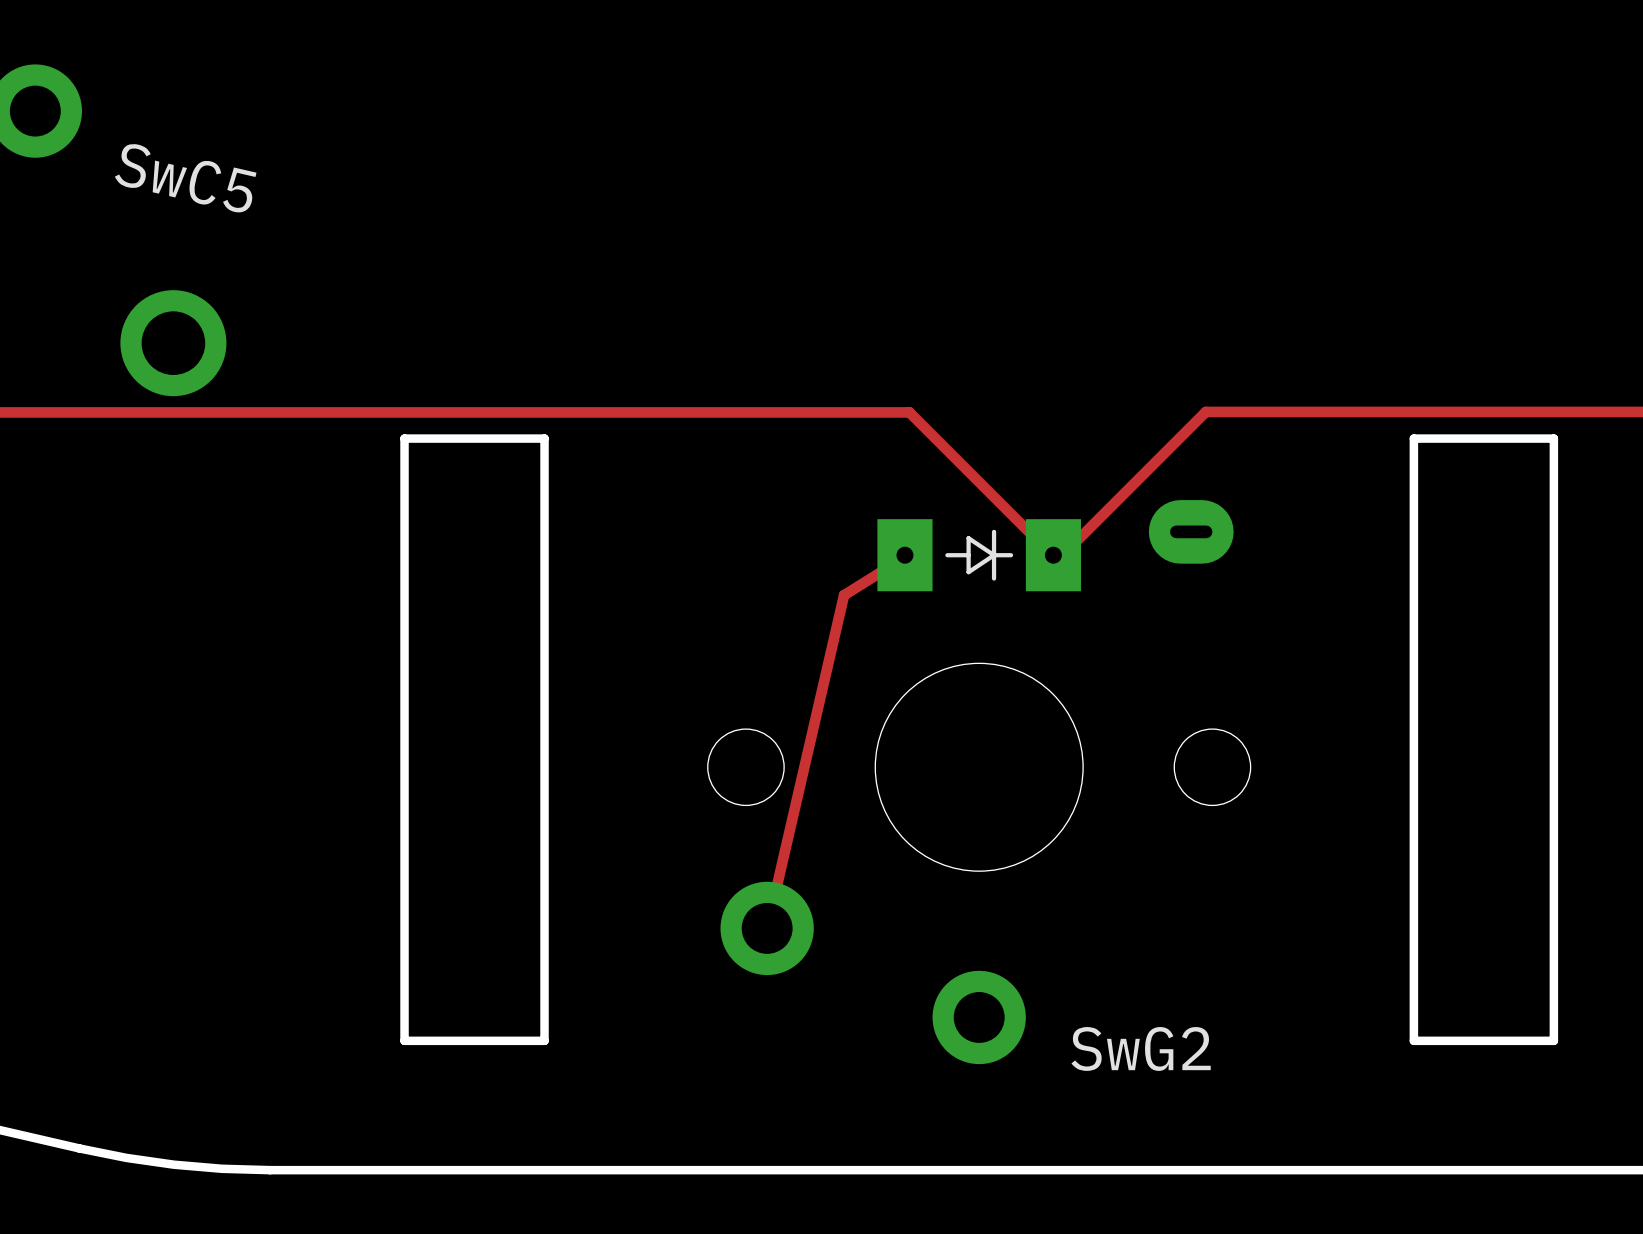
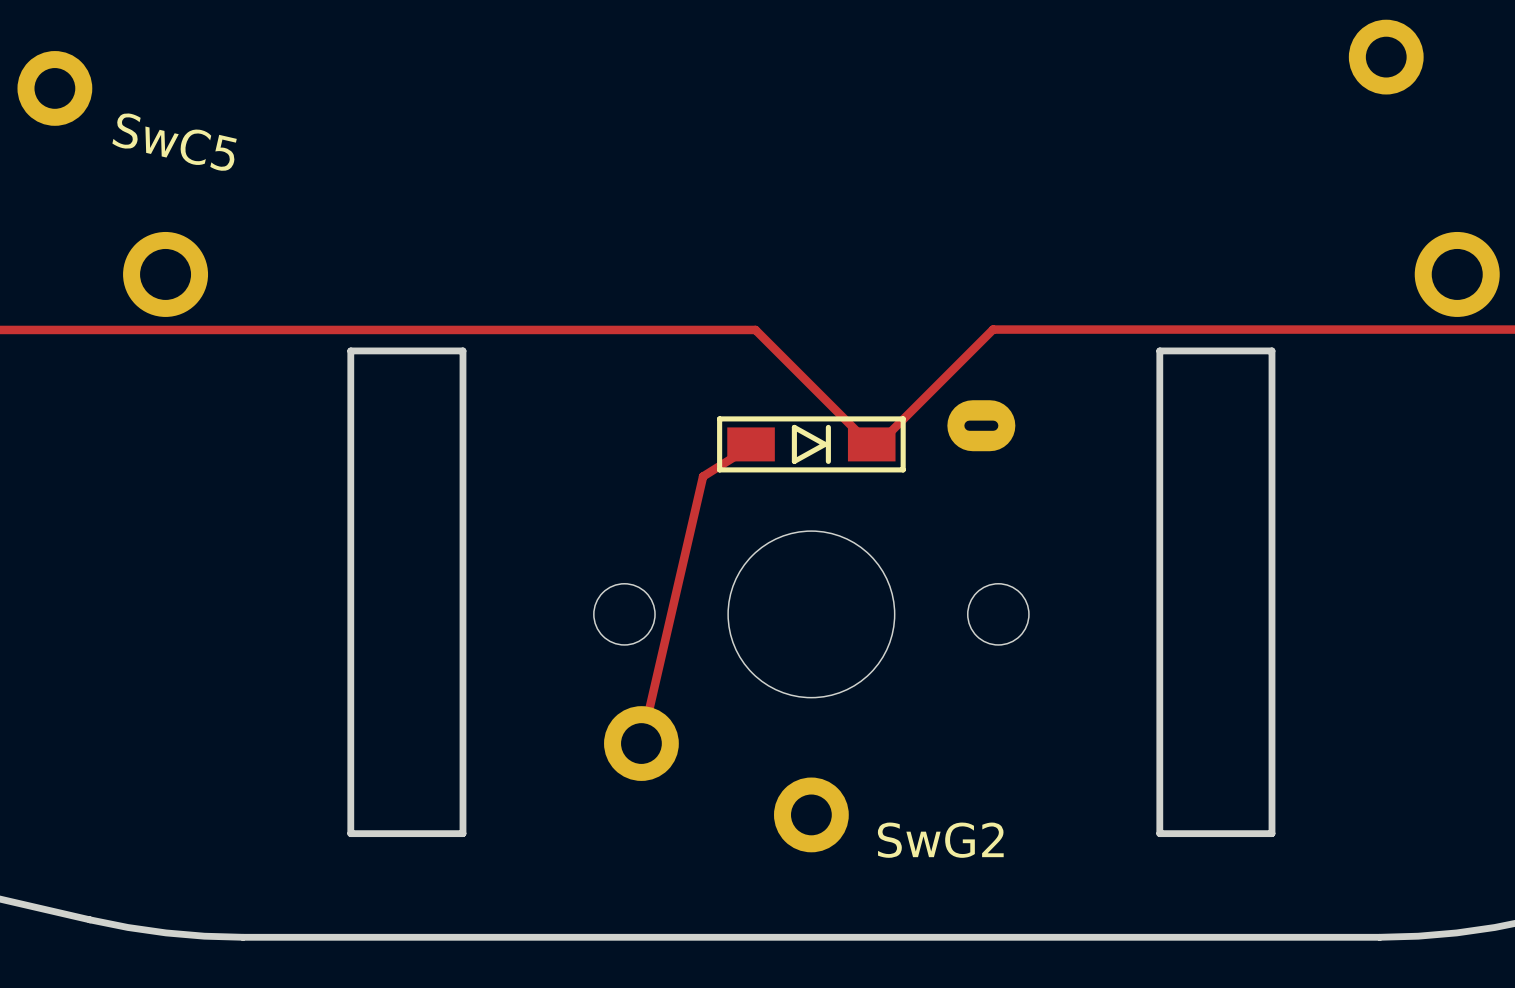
part footprint: [877, 519, 1081, 592] -> [717, 416, 906, 473]

